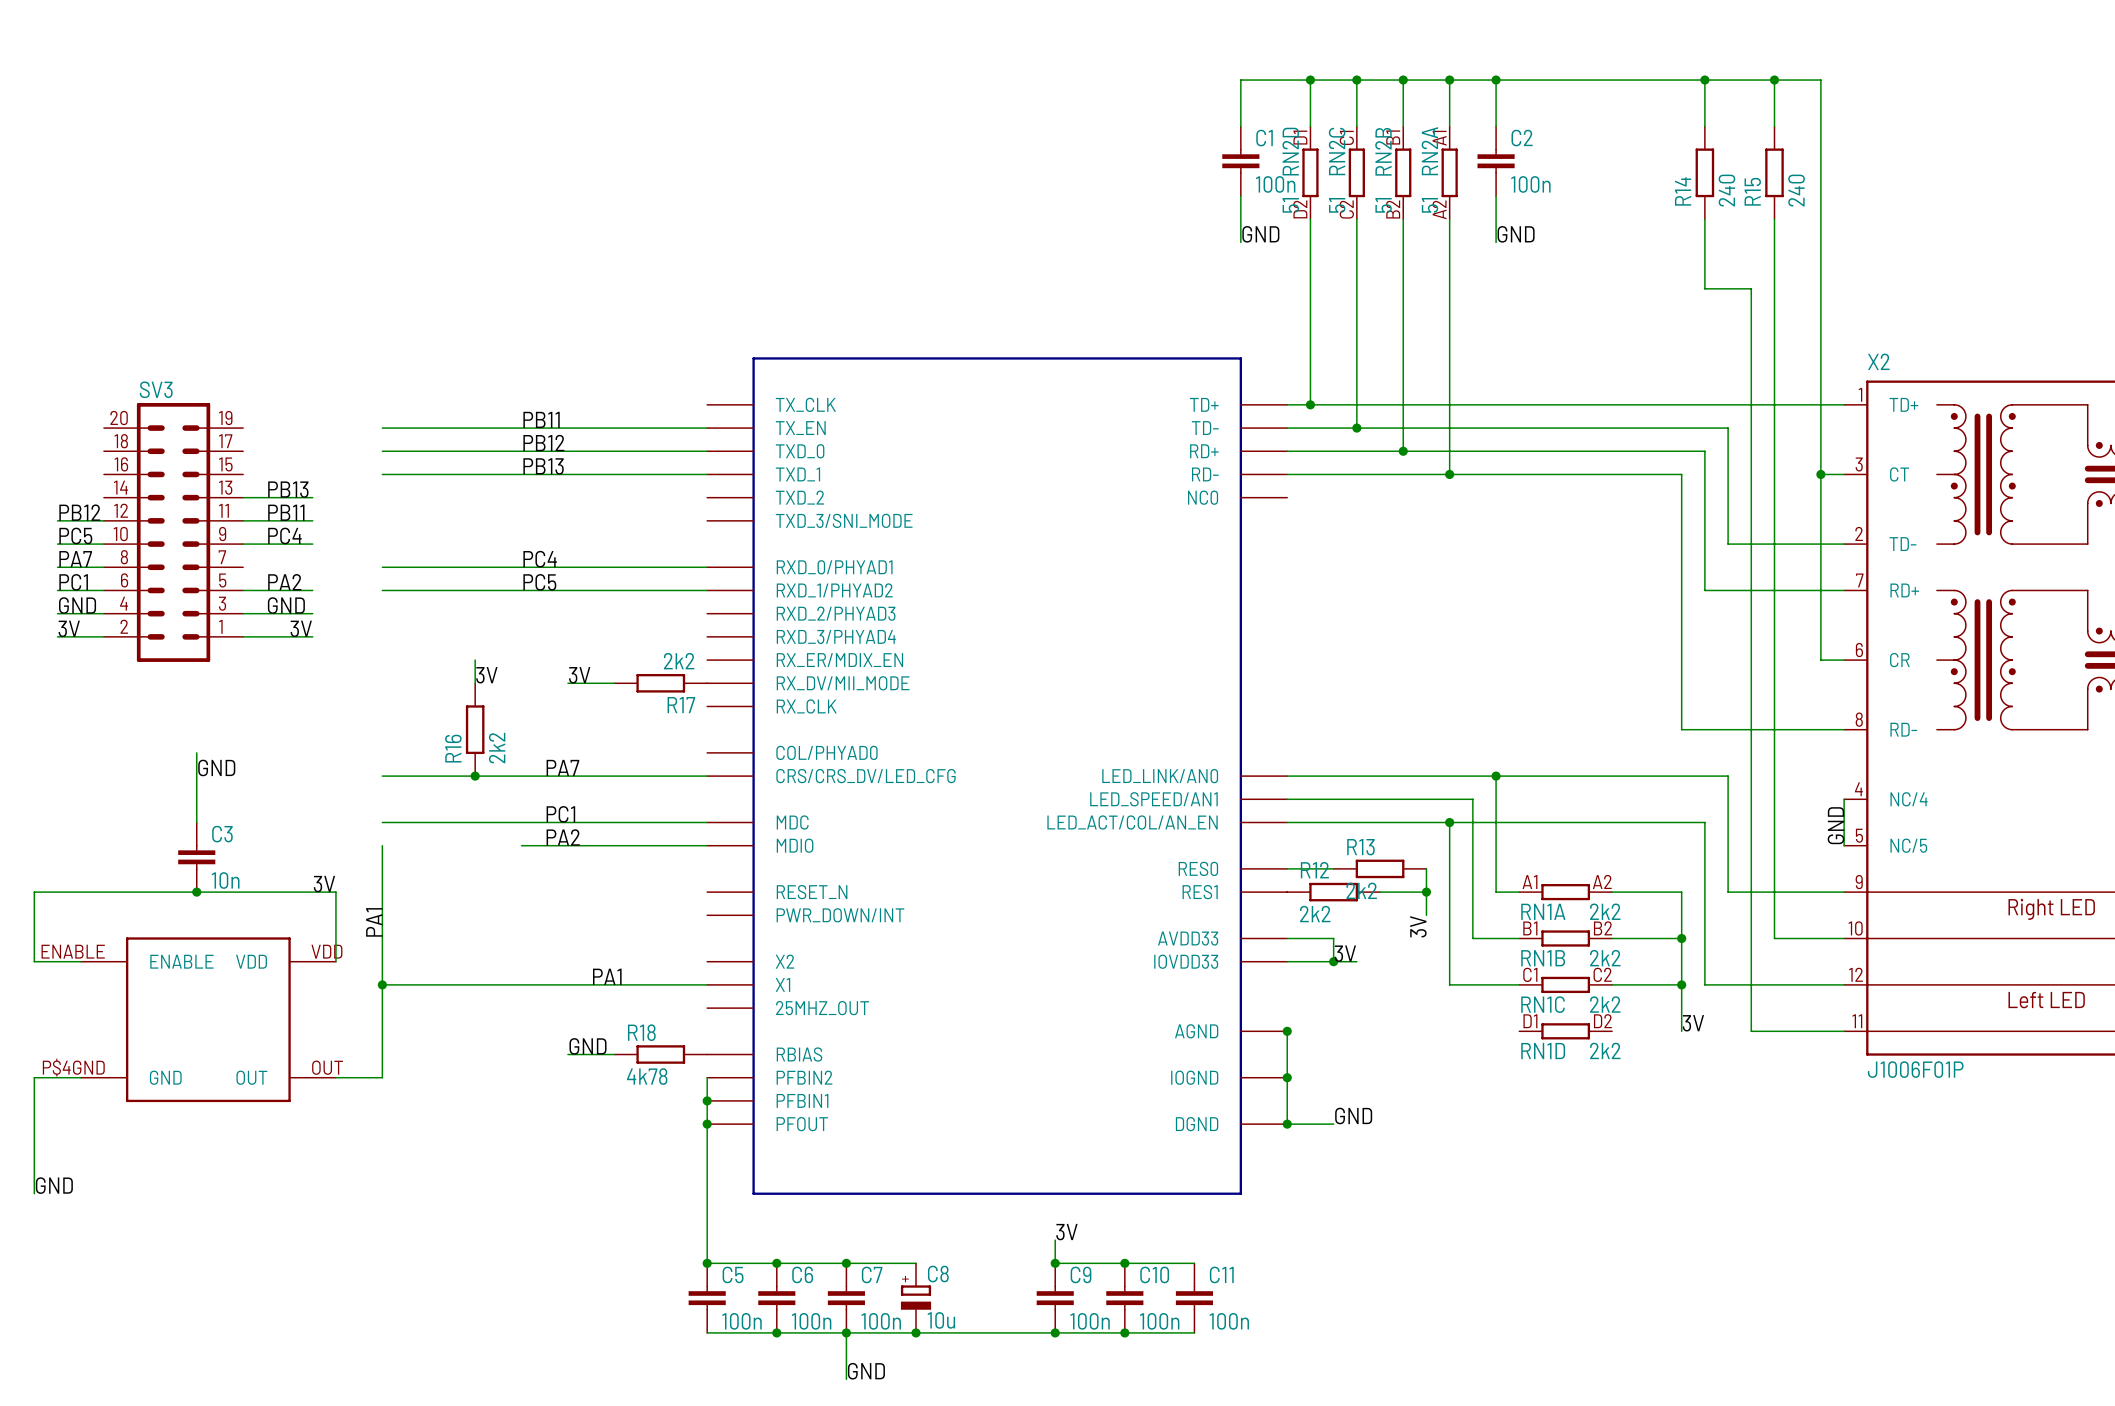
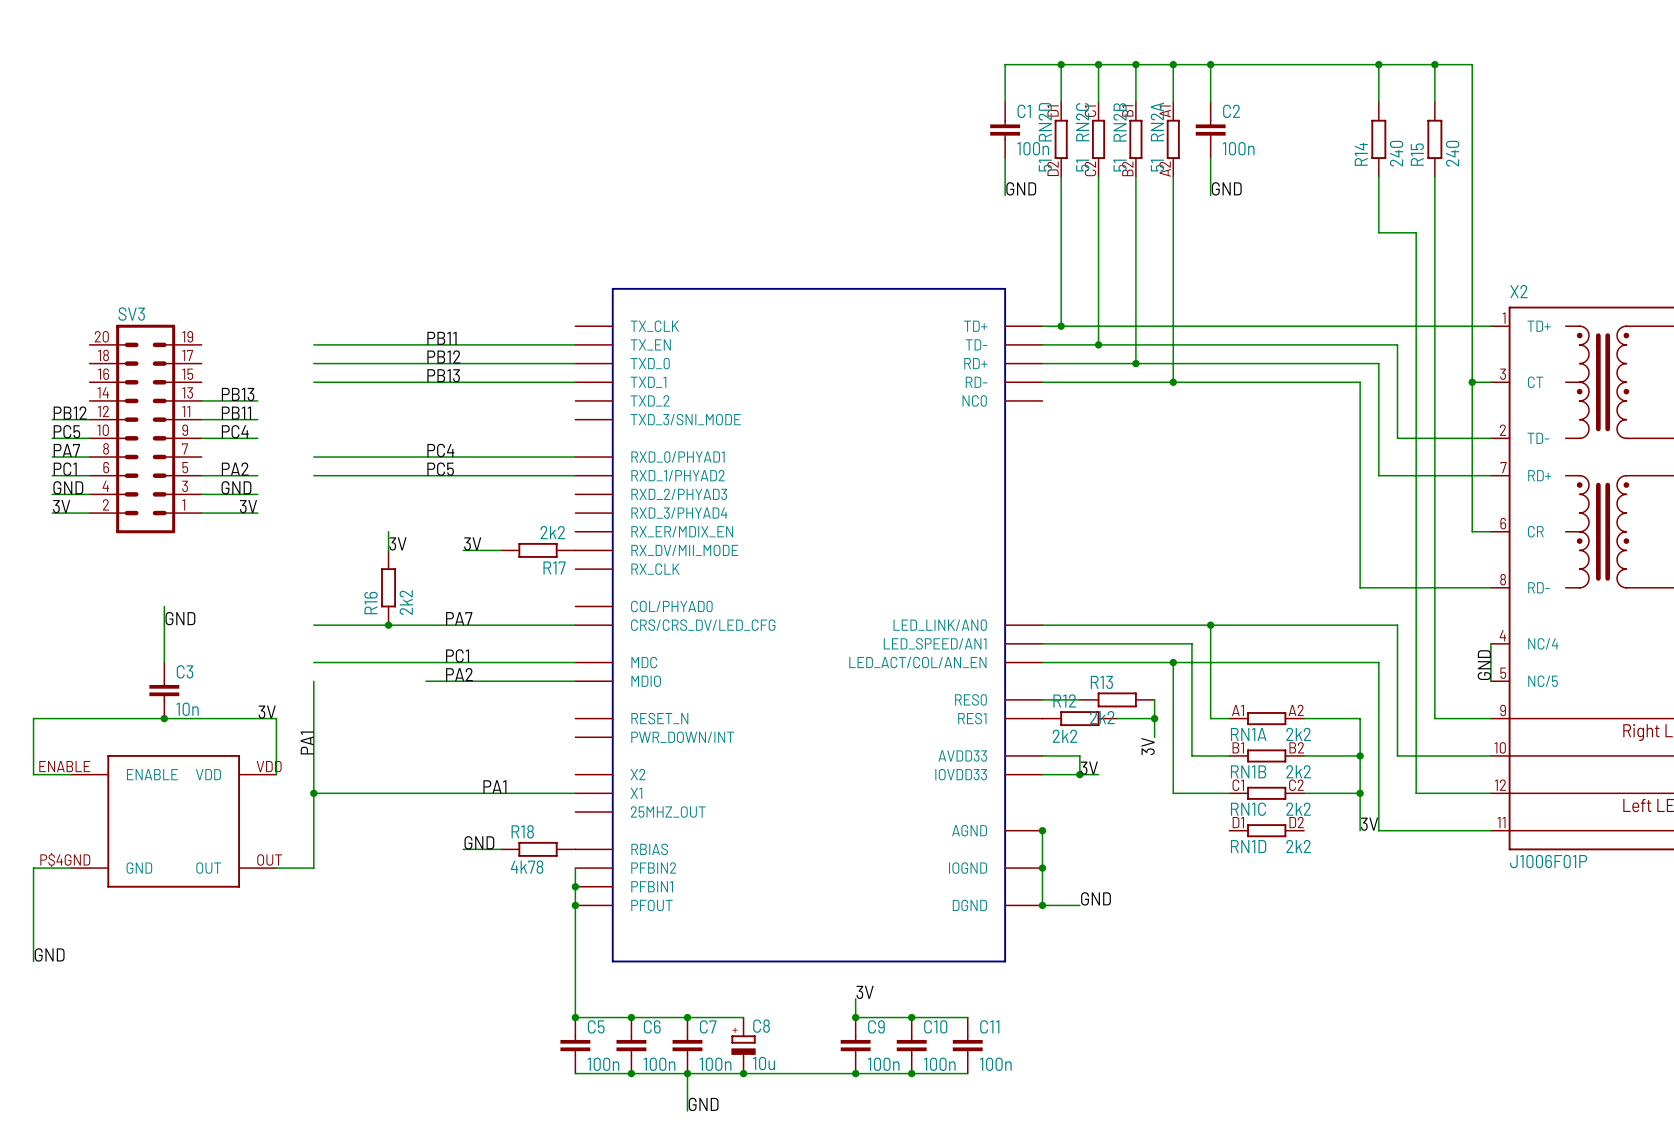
wire: (1728, 892) (1774, 892) (1774, 938) -> (1397, 718) (1397, 755) (1434, 755)
wire: (1704, 984) (1751, 984) (1751, 1031) -> (1378, 793) (1378, 830) (1416, 830)

